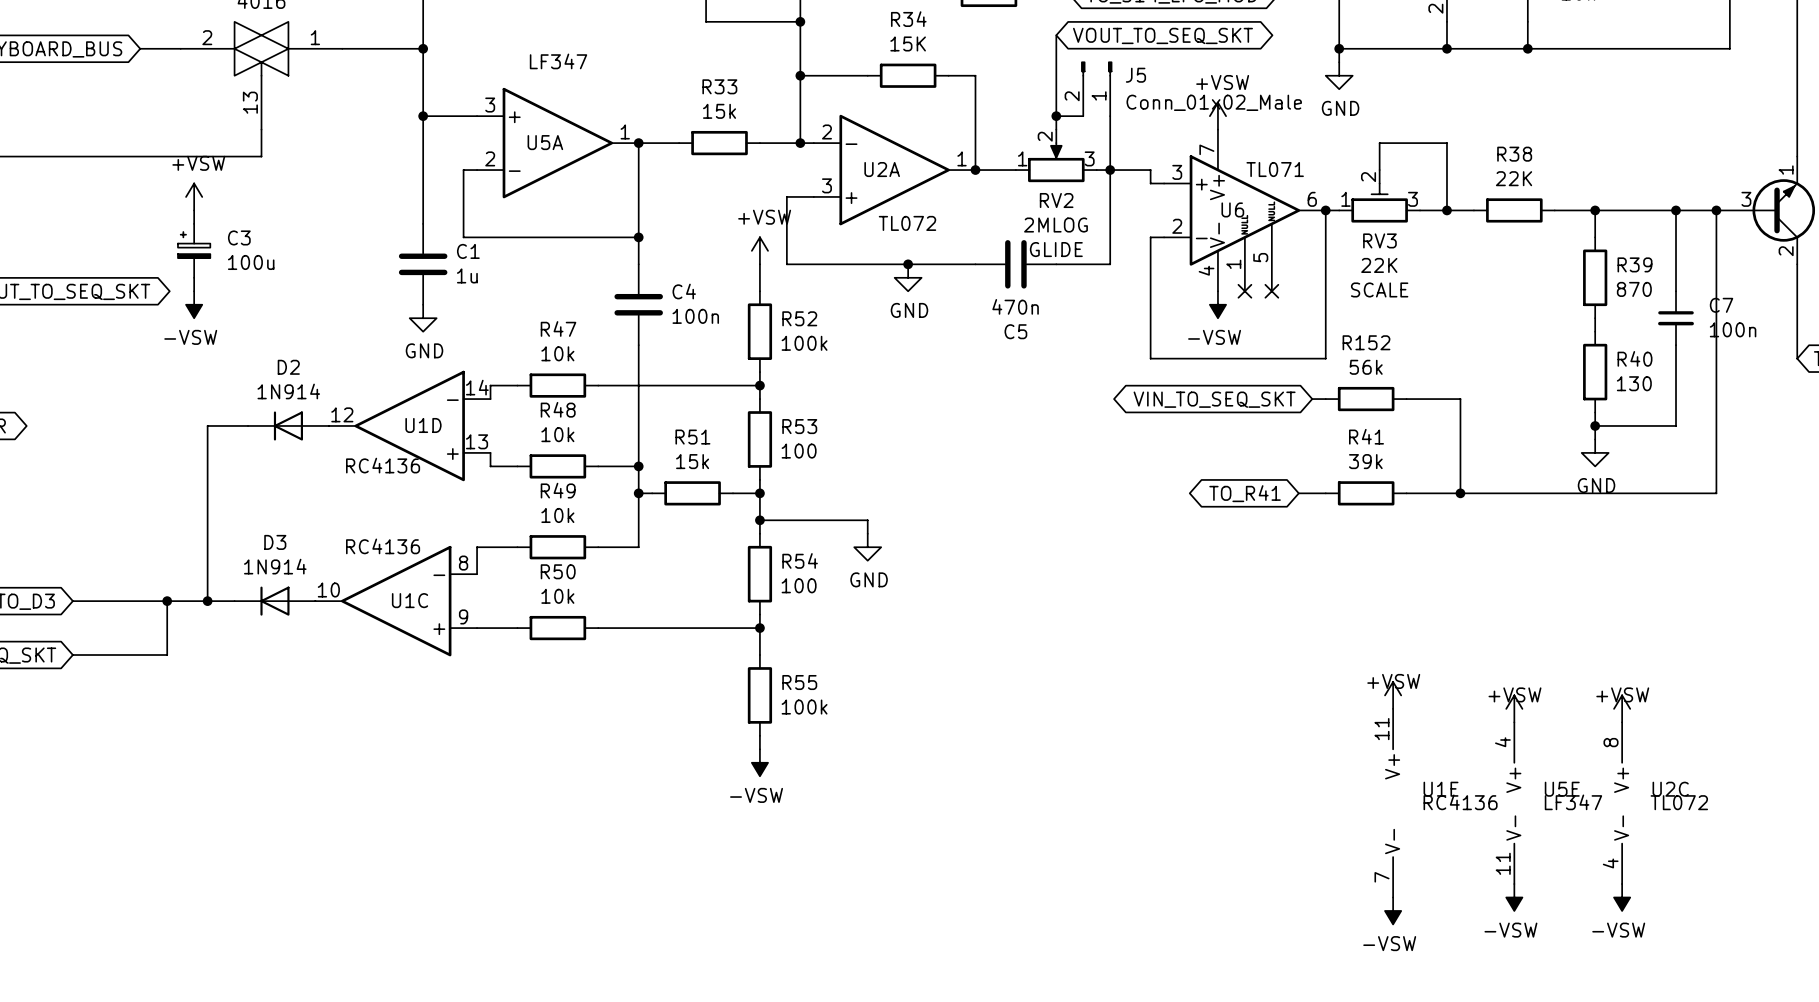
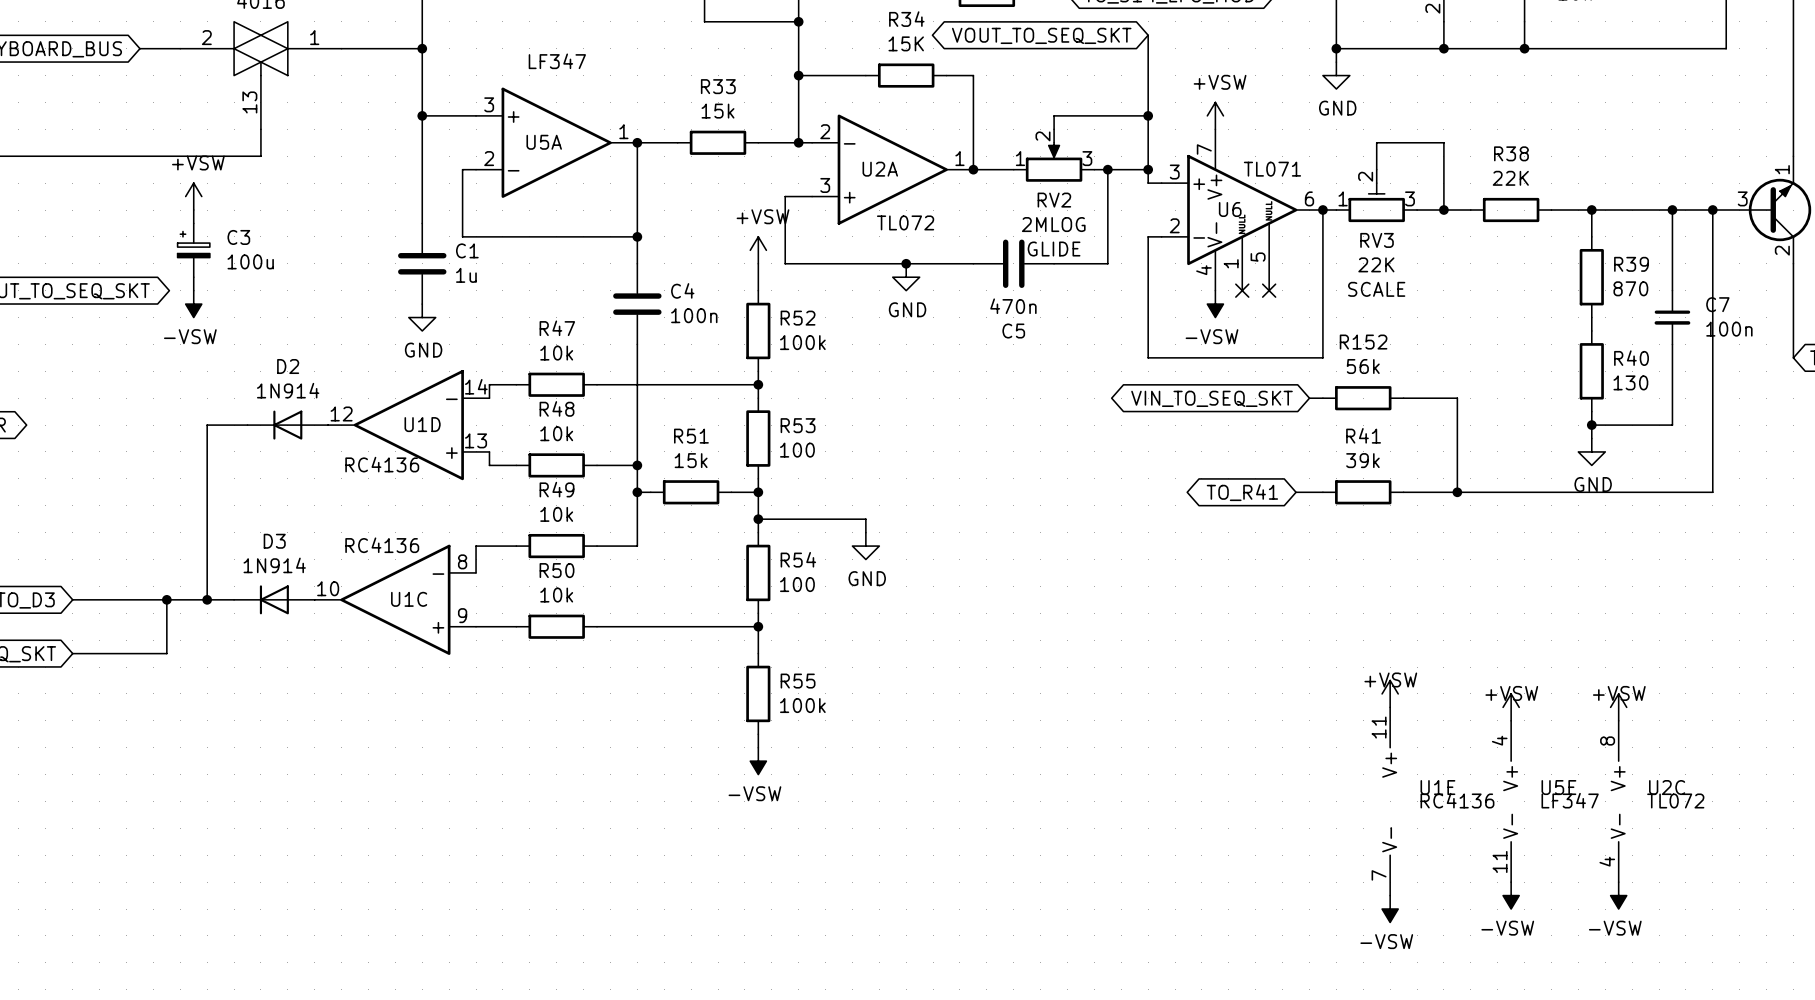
wire: (1056, 35) (1056, 116) -> none
wire: none -> (1148, 35) (1148, 169)
global label rotation: 0° (1162, 35) -> 180° (1041, 35)
J5: Conn_01x02_Male (1096, 88) -> none
junction: (1056, 116) -> none
wire: none -> (1080, 115) (1148, 115)
wire: (1110, 116) (1110, 170) -> none
junction: none -> (1148, 115)
junction: none -> (1148, 169)

